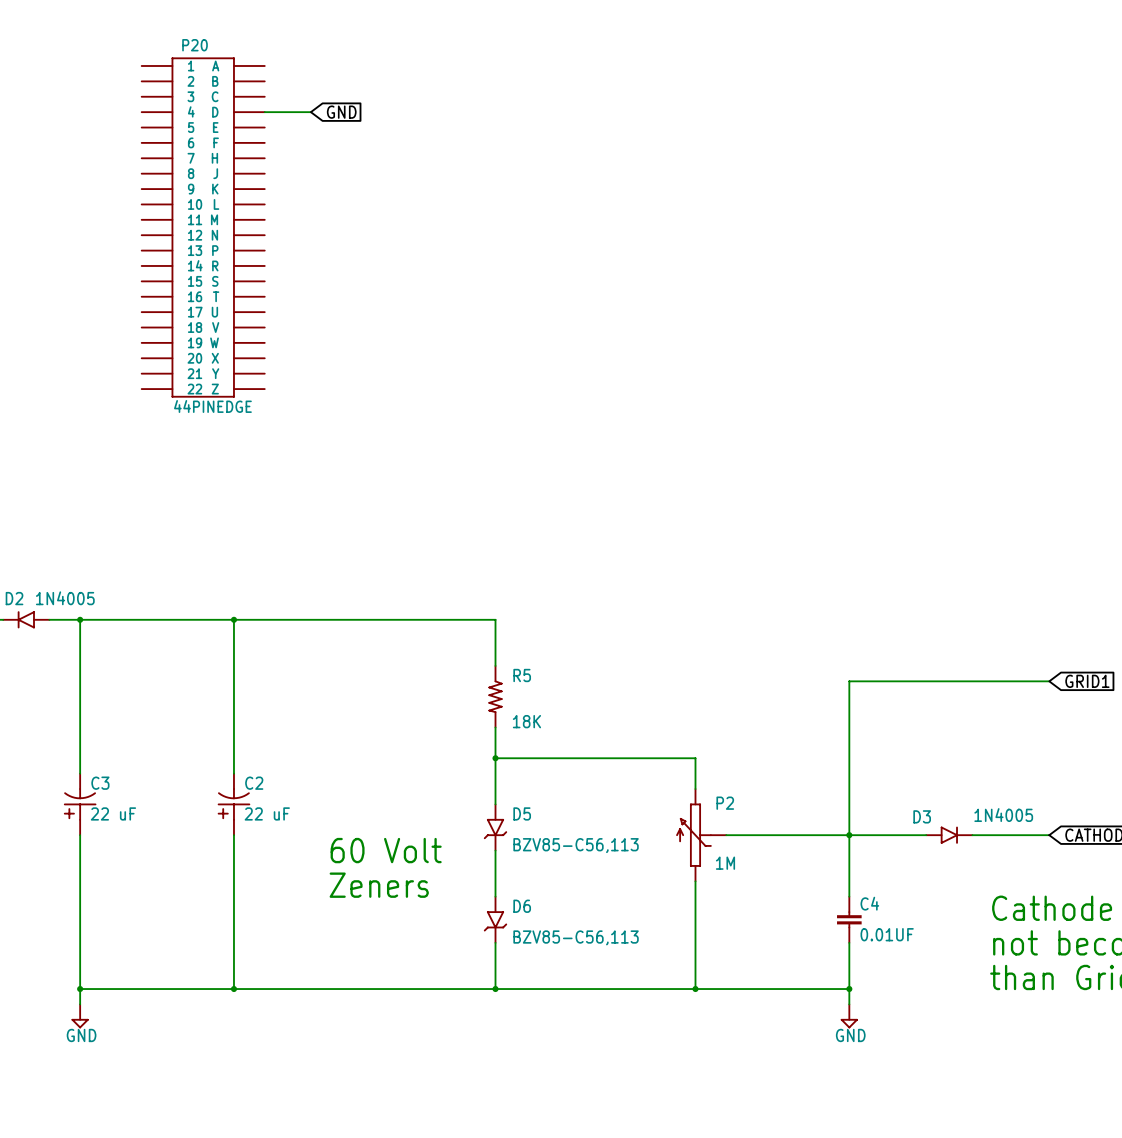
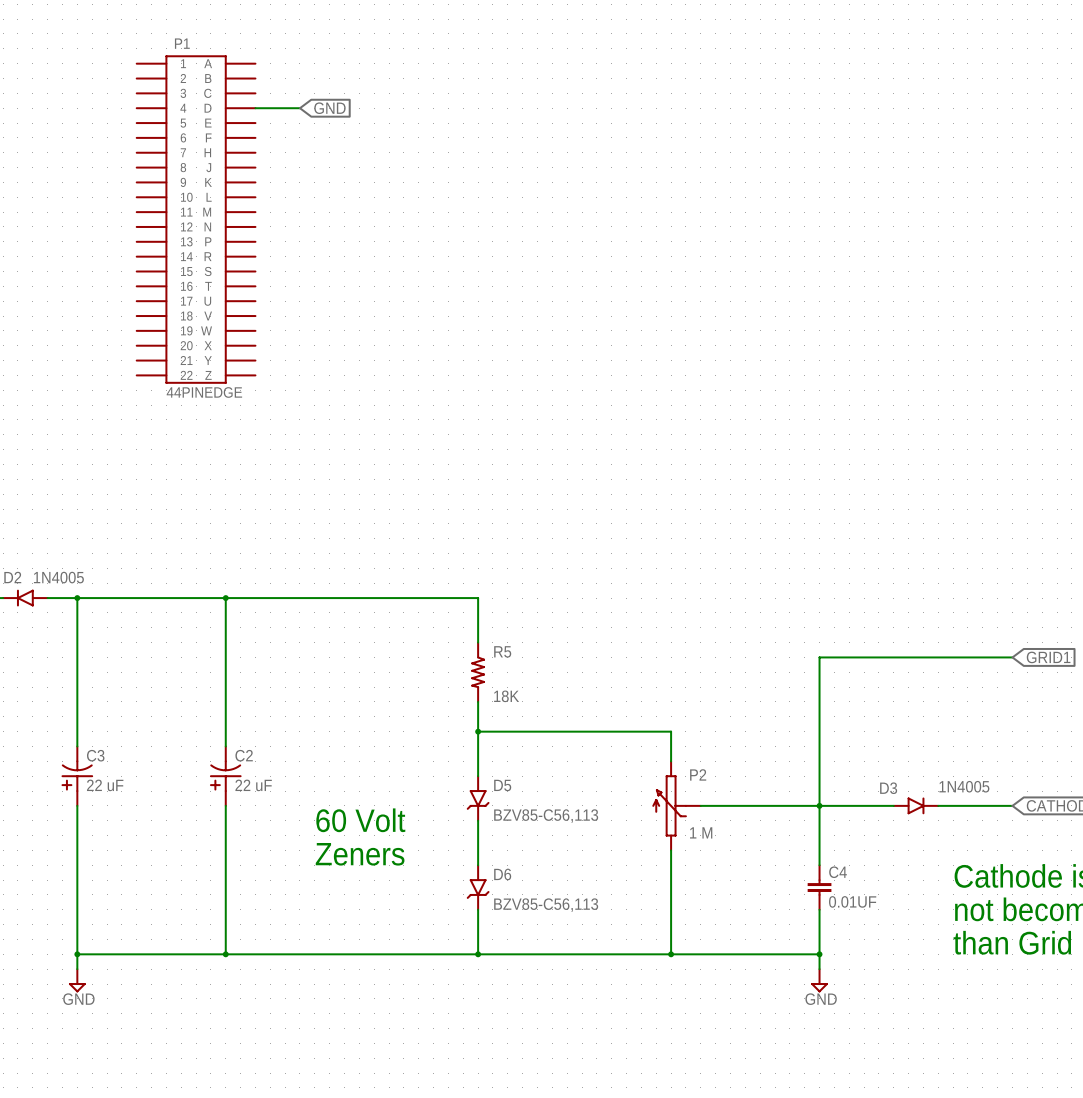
P20 name: P20 (195, 45) -> P1 (182, 43)
P2 value: 1M (725, 863) -> 1 M (701, 832)

